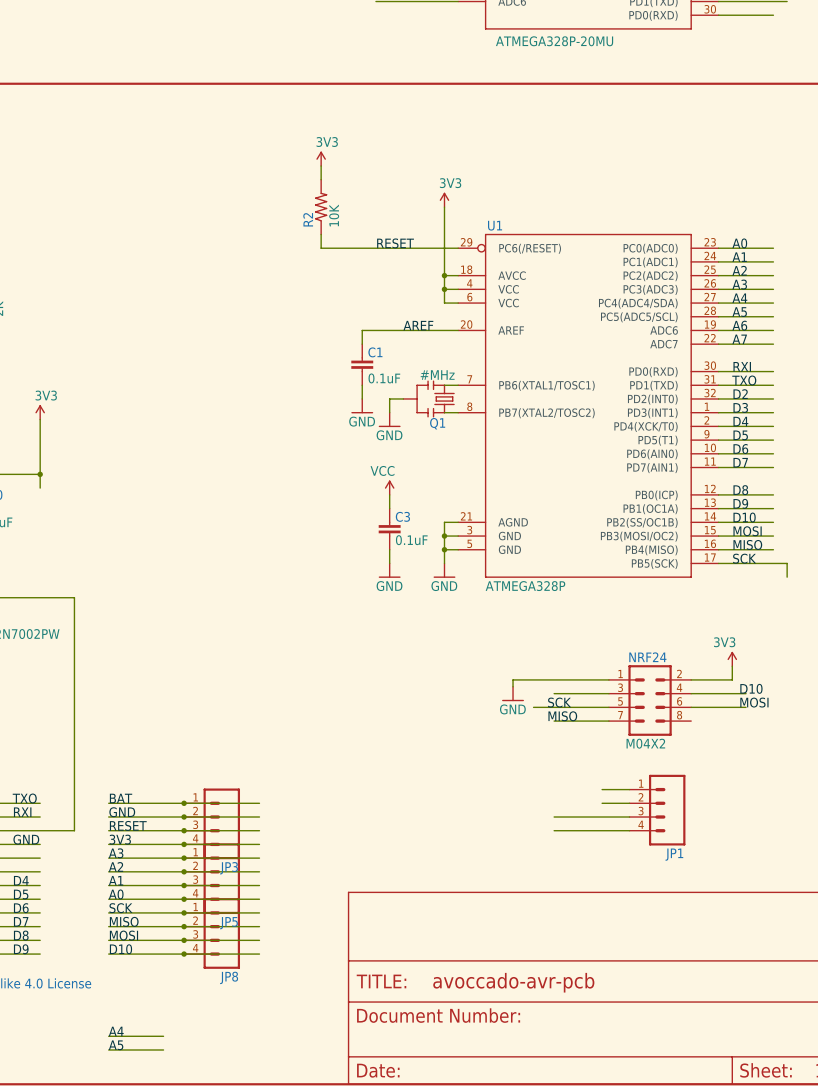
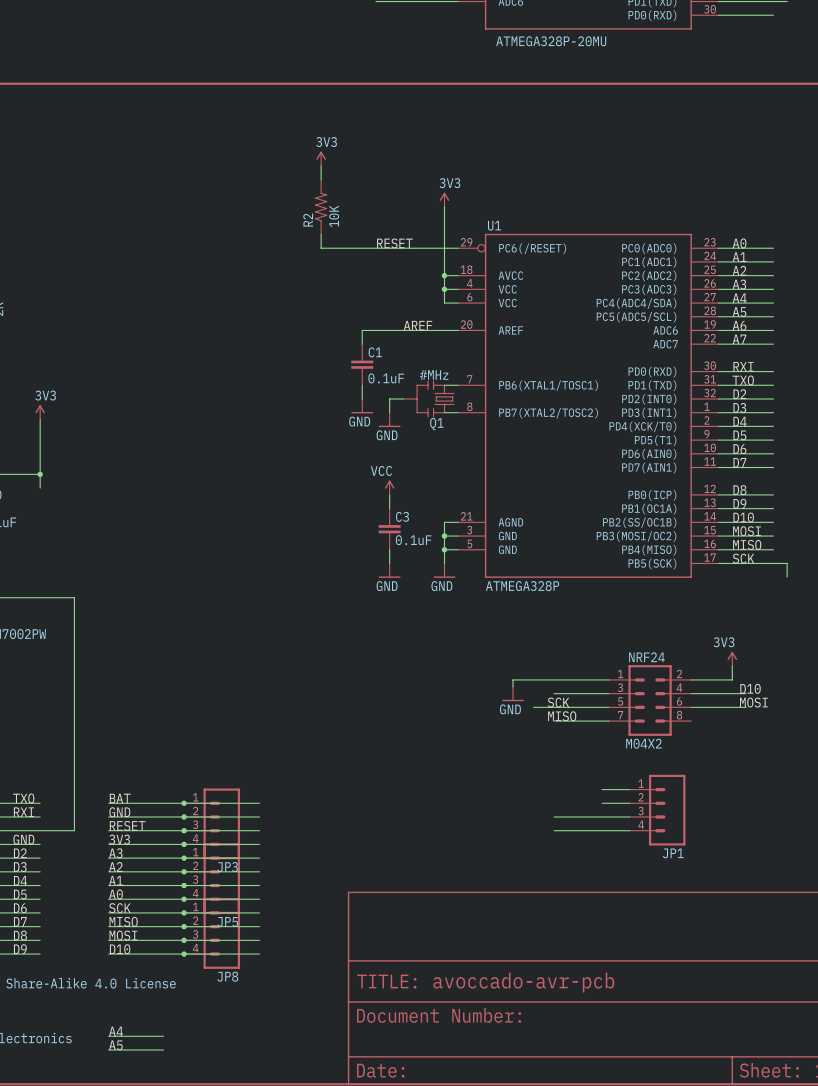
label: none -> D2 (20, 853)
label: none -> D3 (20, 867)

